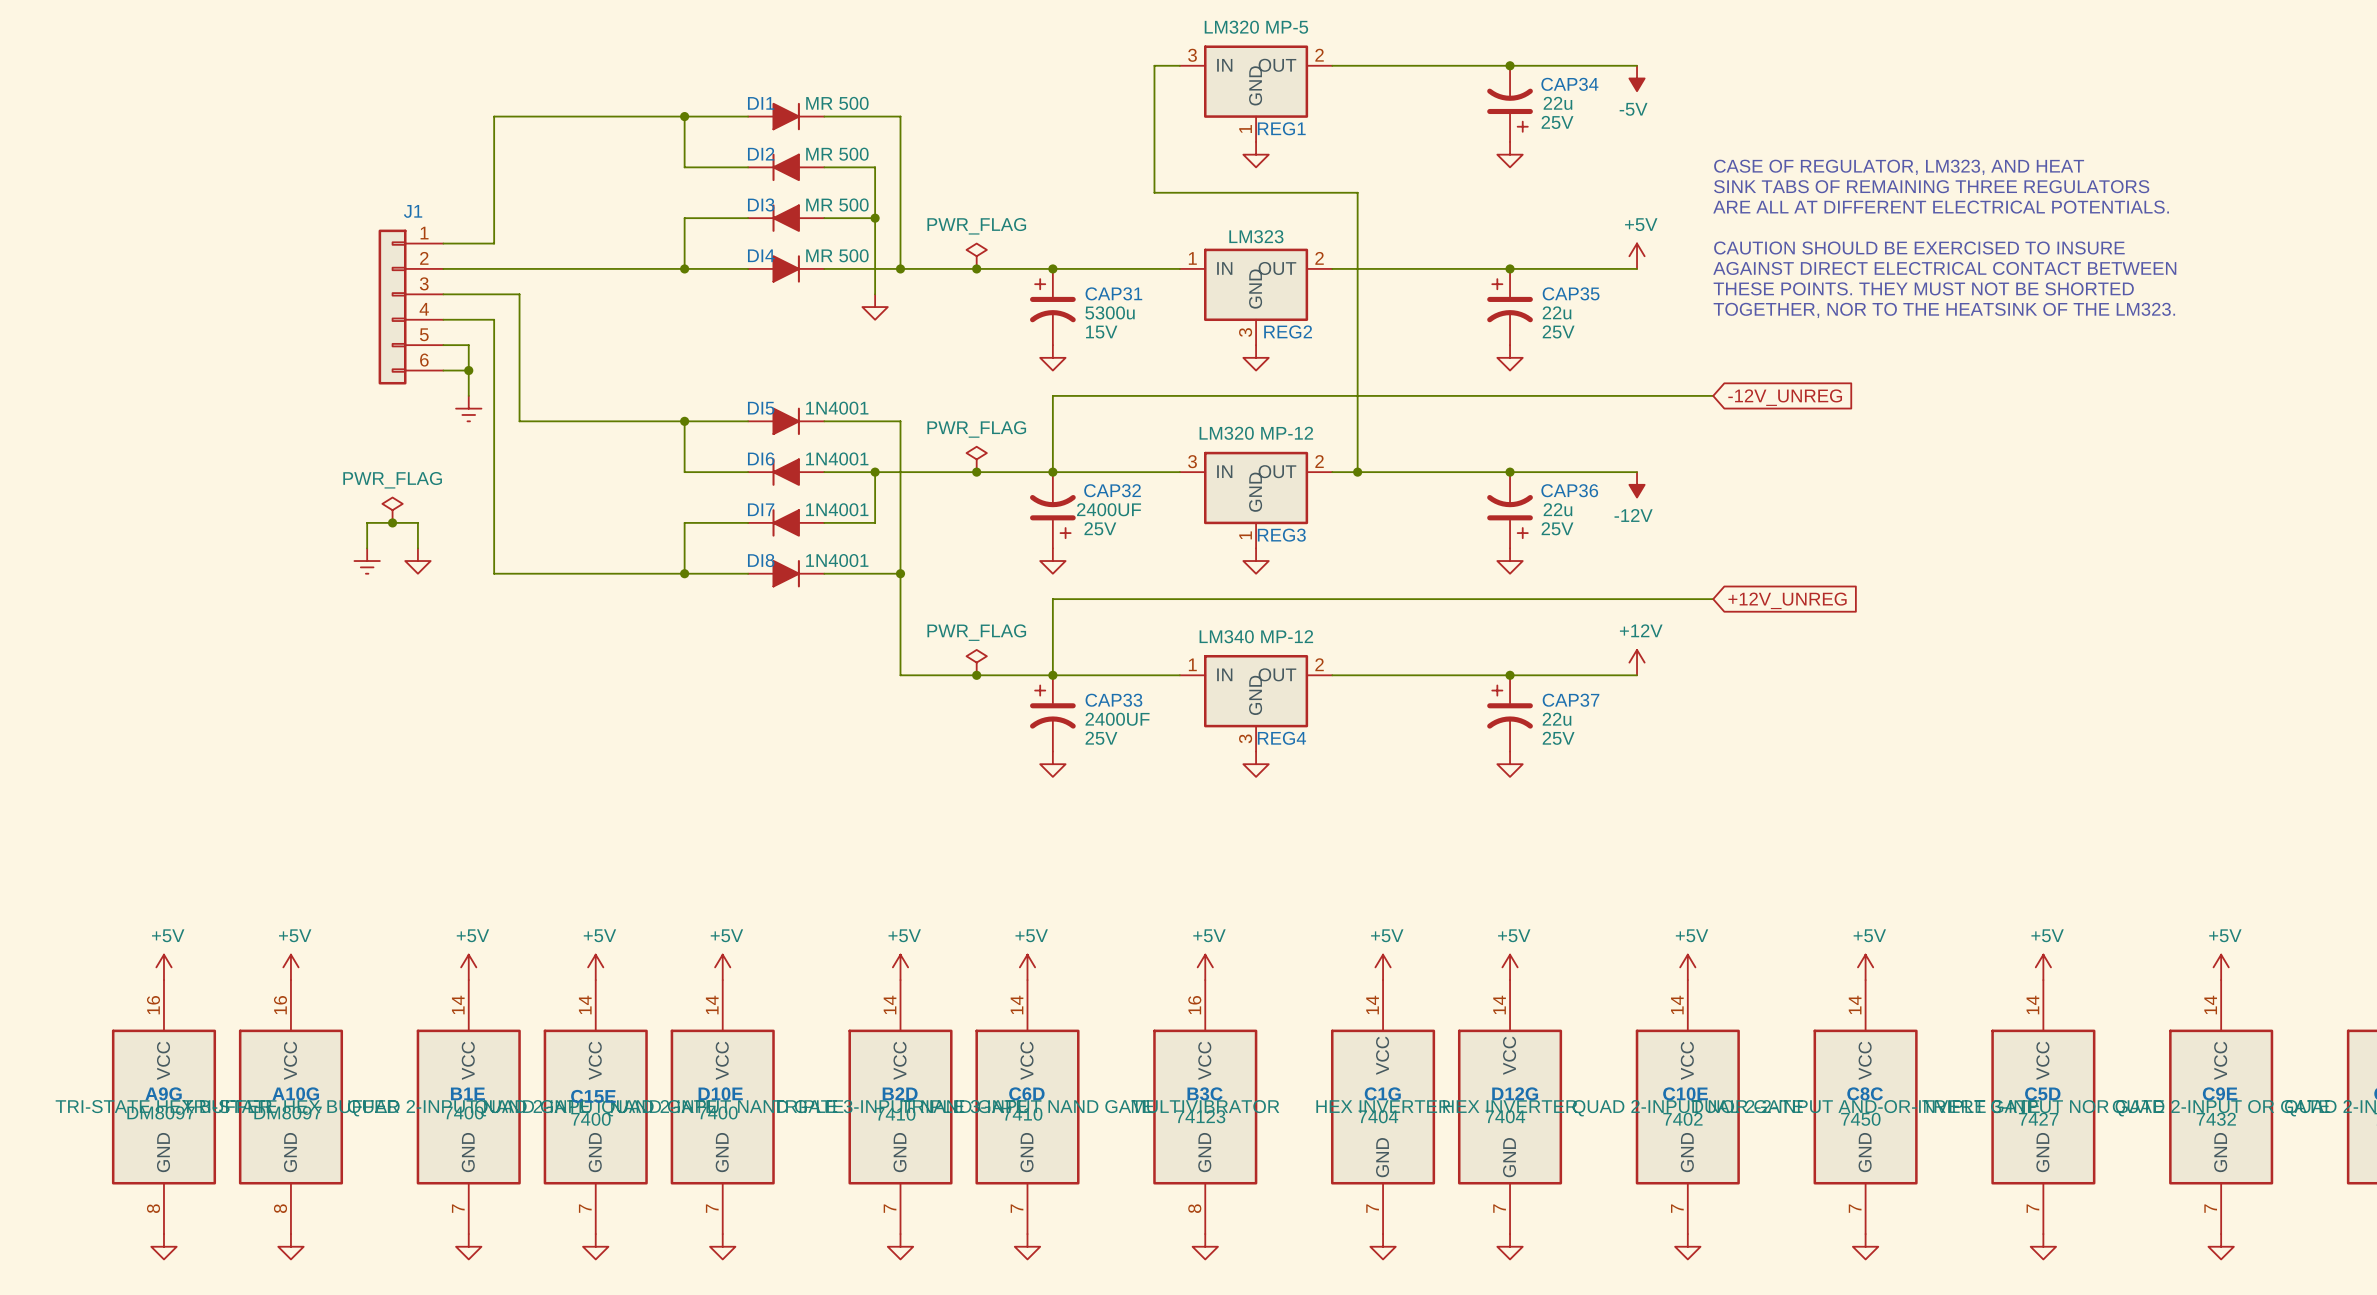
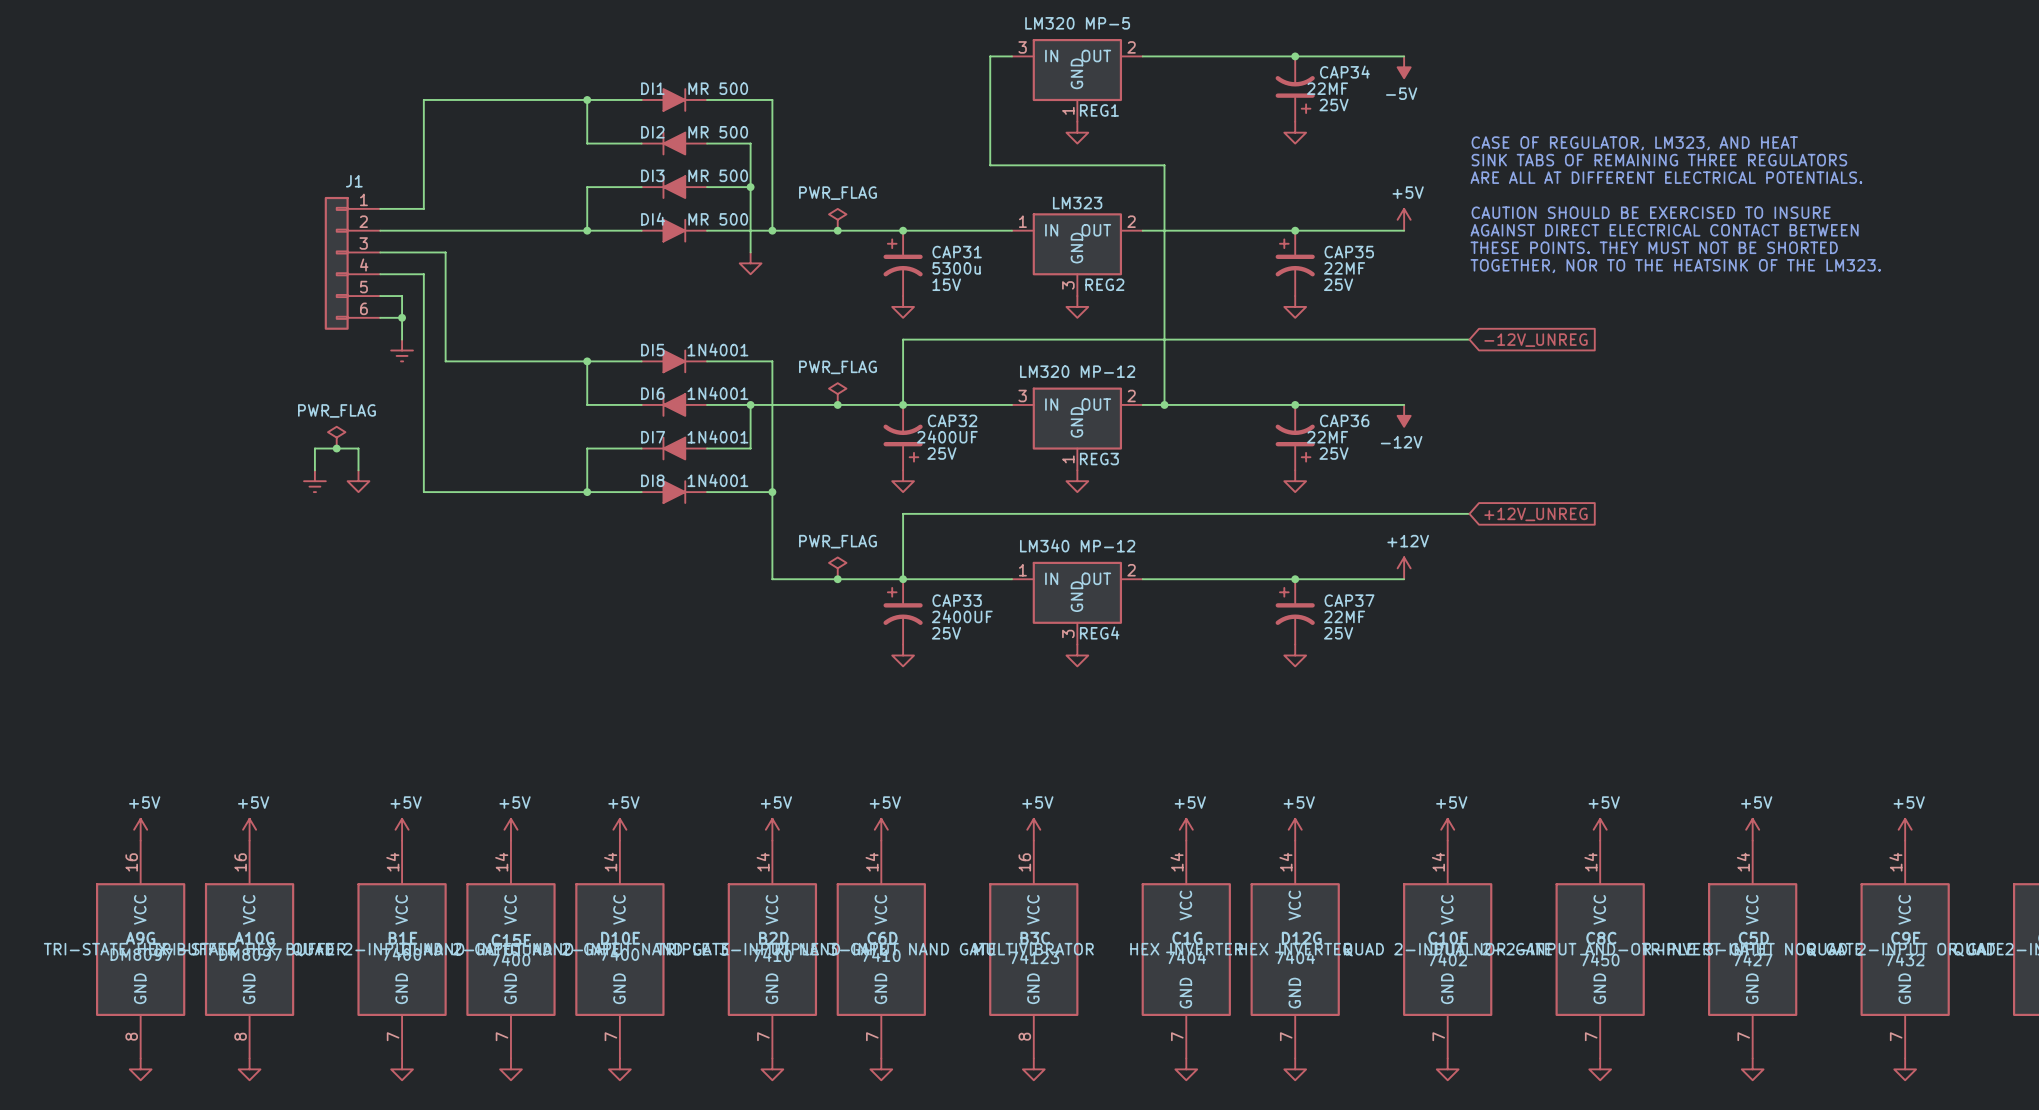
CAP34 value: 22u (1557, 103) -> 22MF (1327, 88)
CAP35 value: 22u (1557, 312) -> 22MF (1344, 268)
CAP36 value: 22u (1557, 509) -> 22MF (1327, 437)
CAP37 value: 22u (1557, 719) -> 22MF (1344, 616)

